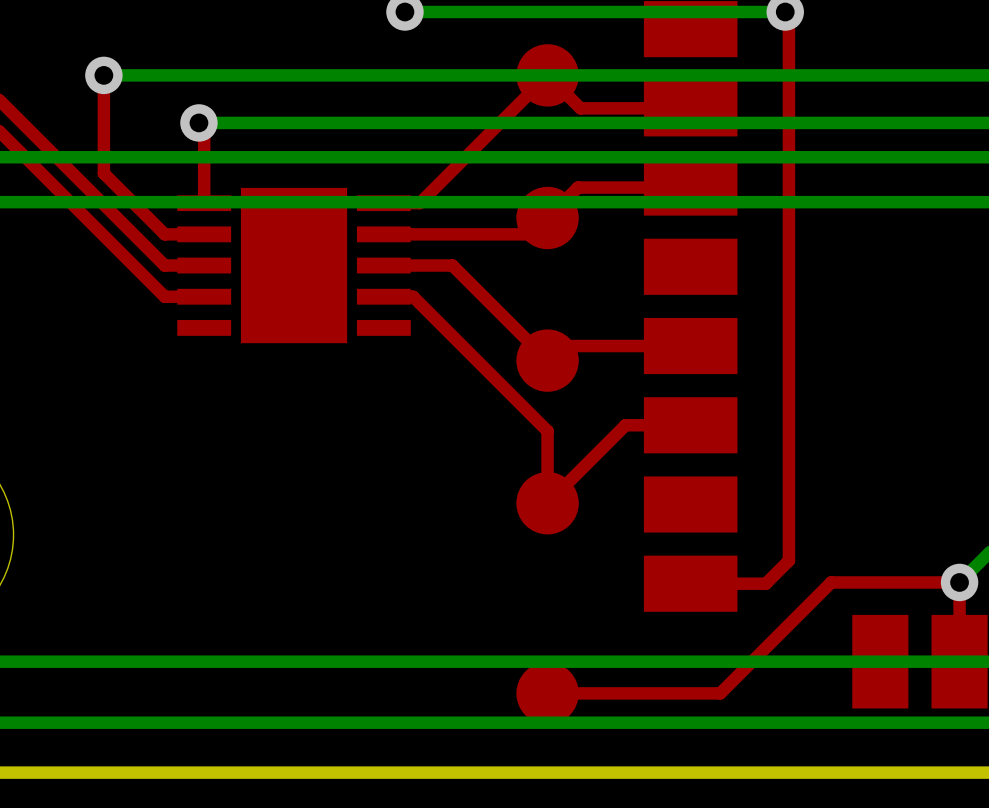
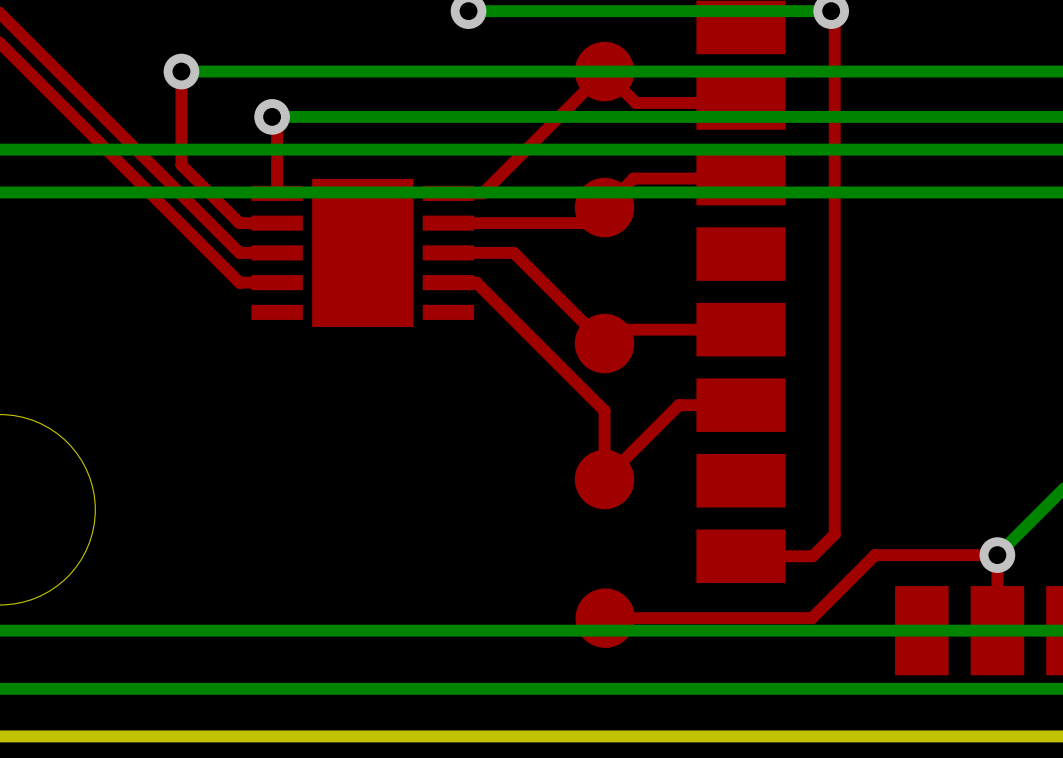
top track: (765, 648) (720, 693) (547, 693) -> (811, 618) (605, 618)
part position: (547, 693) -> (605, 618)

